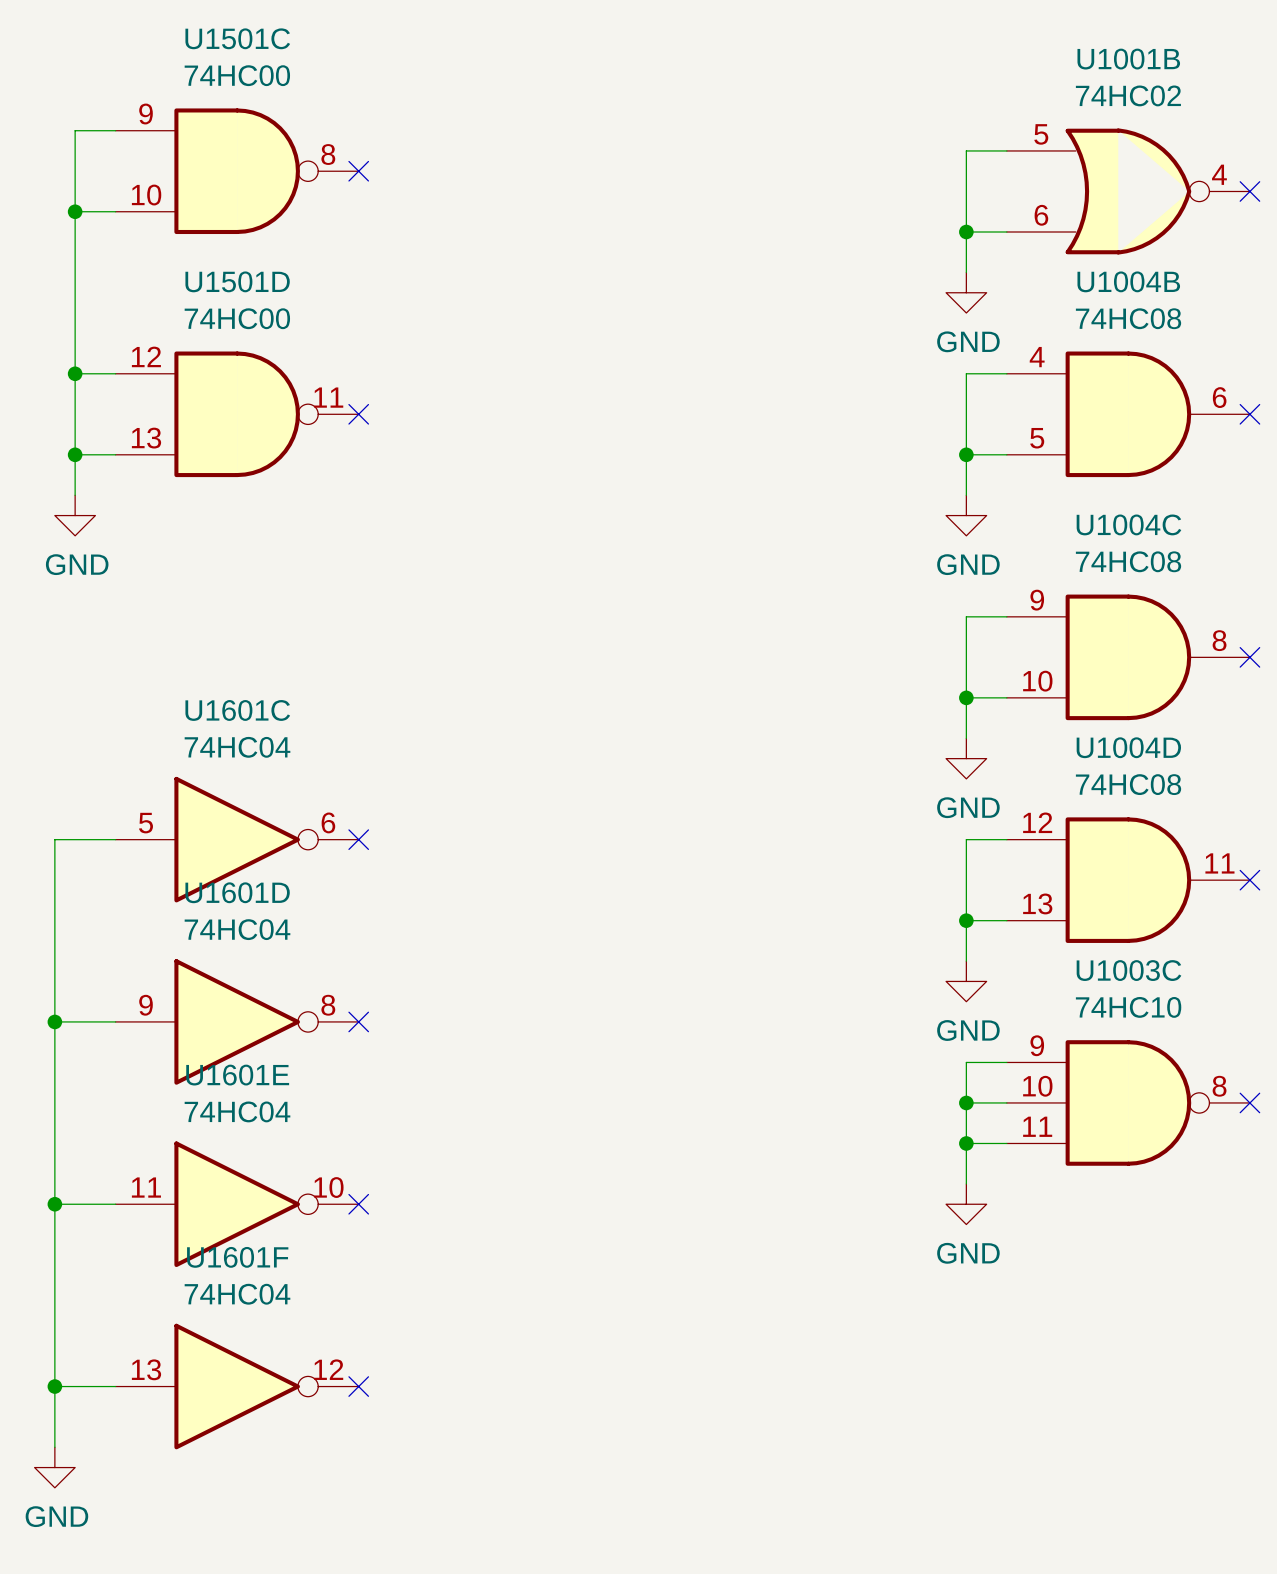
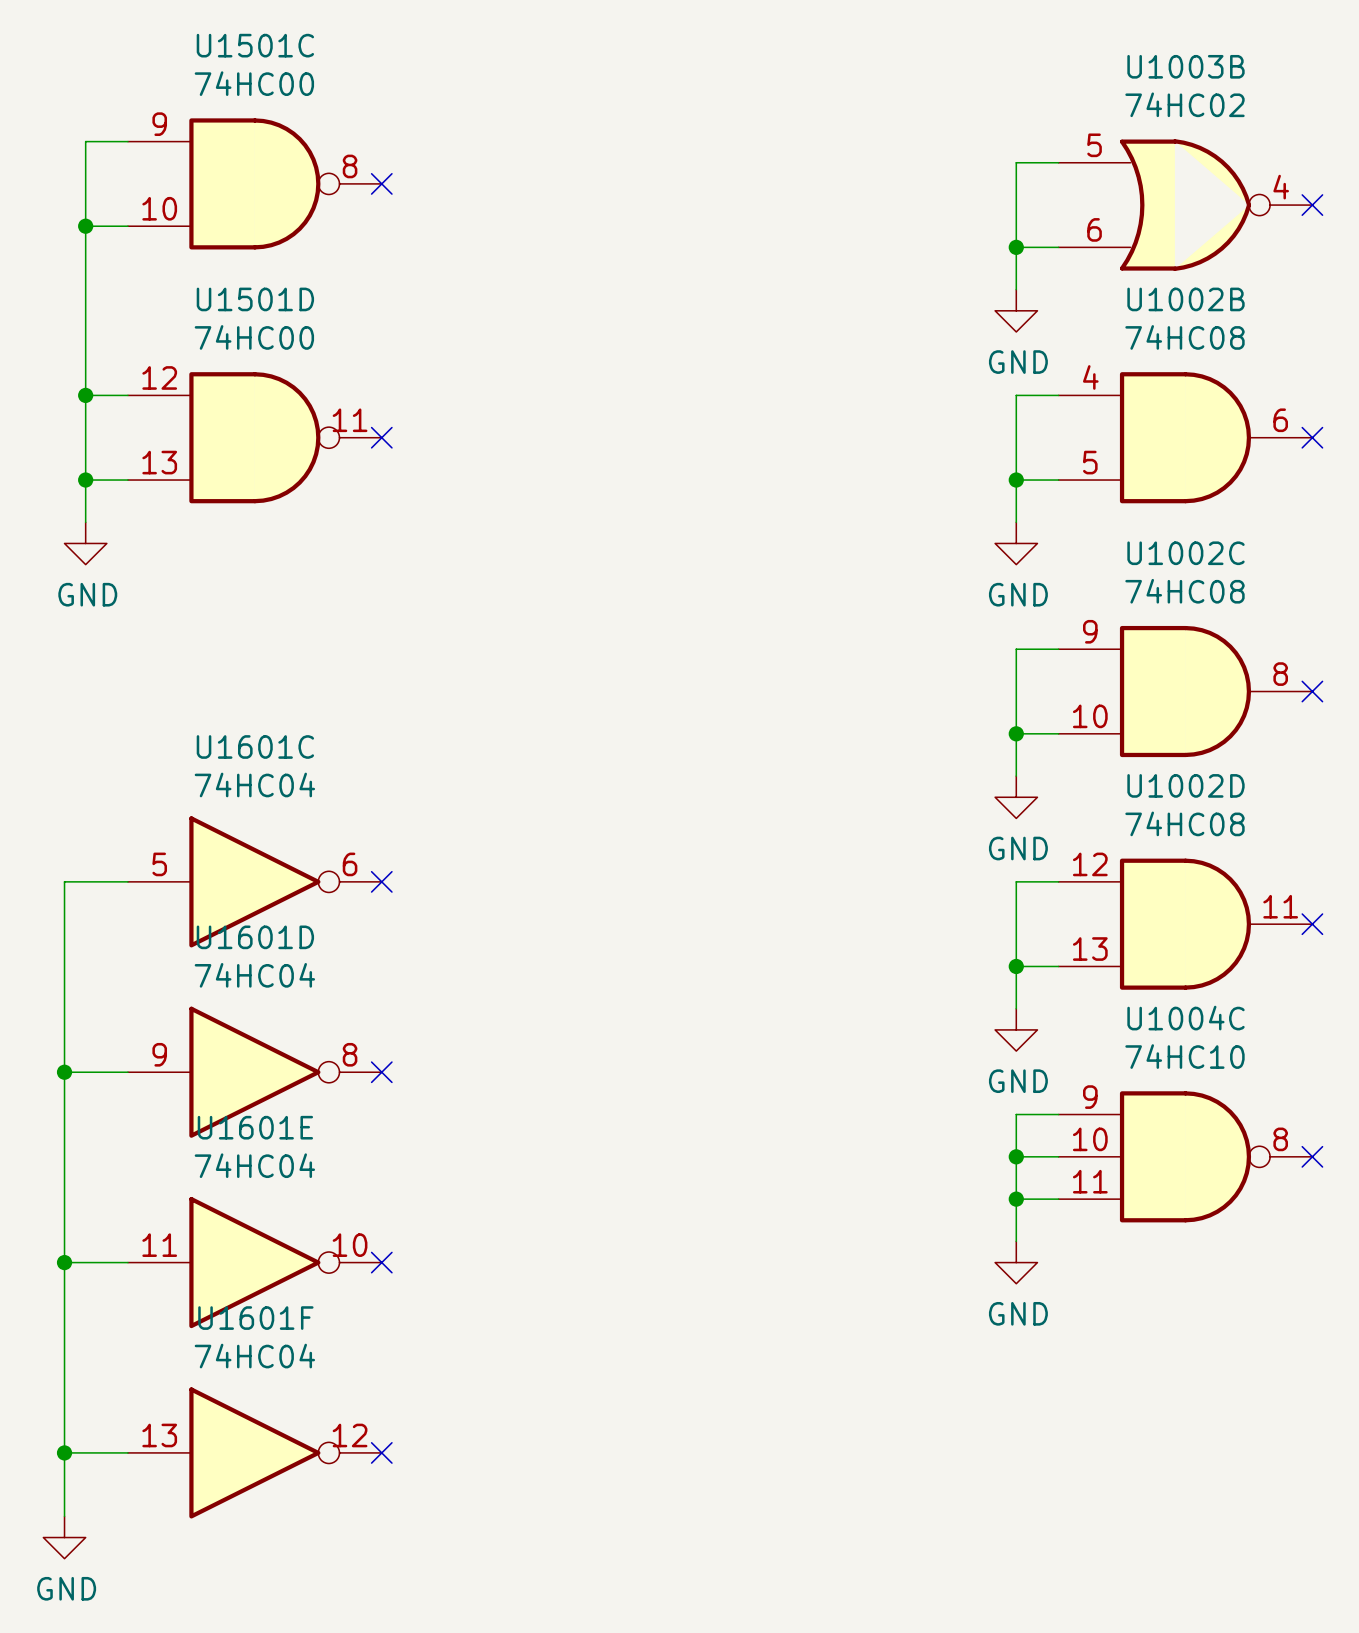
U1001B name: U1001B (1128, 59) -> U1003B (1186, 66)
U1004B name: U1004B (1128, 281) -> U1002B (1186, 299)
U1004C name: U1004C (1128, 524) -> U1002C (1186, 553)
U1004D name: U1004D (1128, 747) -> U1002D (1186, 785)
U1003C name: U1003C (1128, 970) -> U1004C (1186, 1018)

